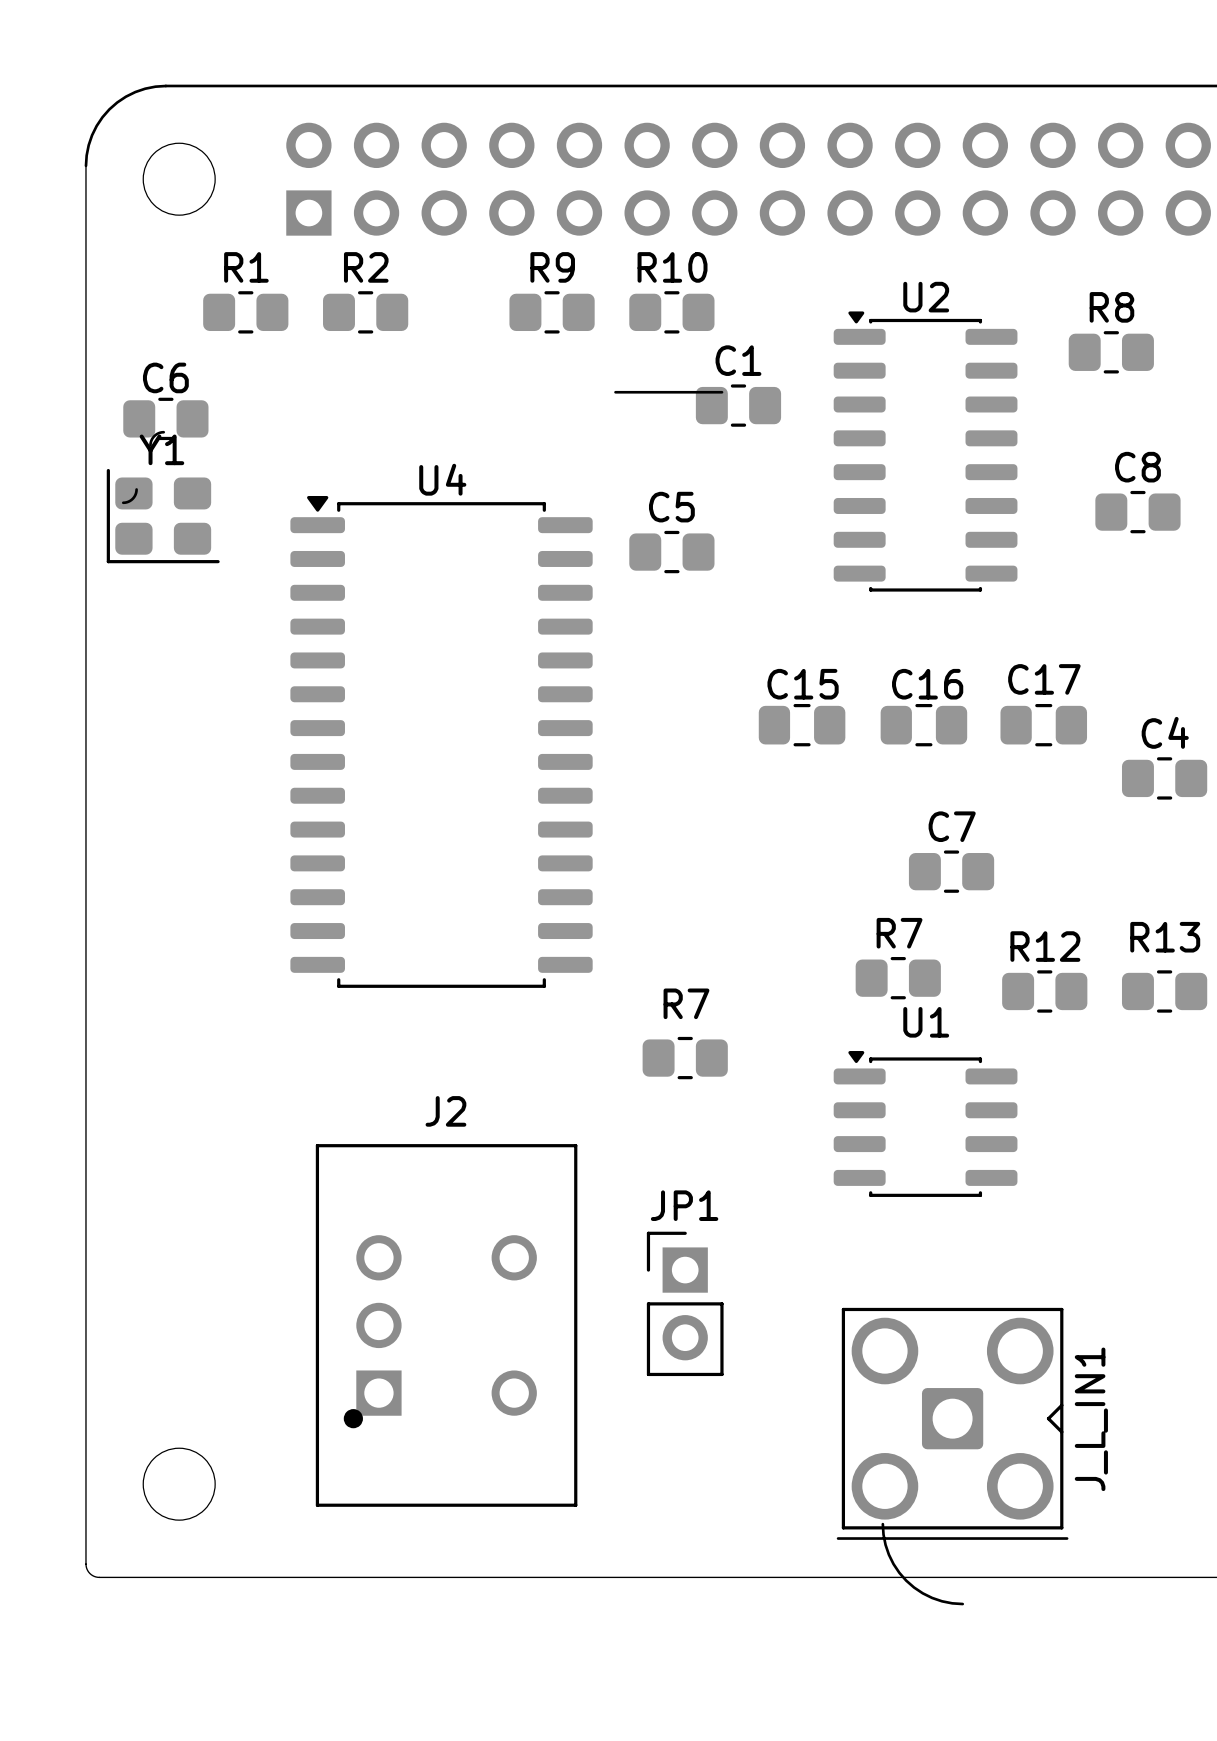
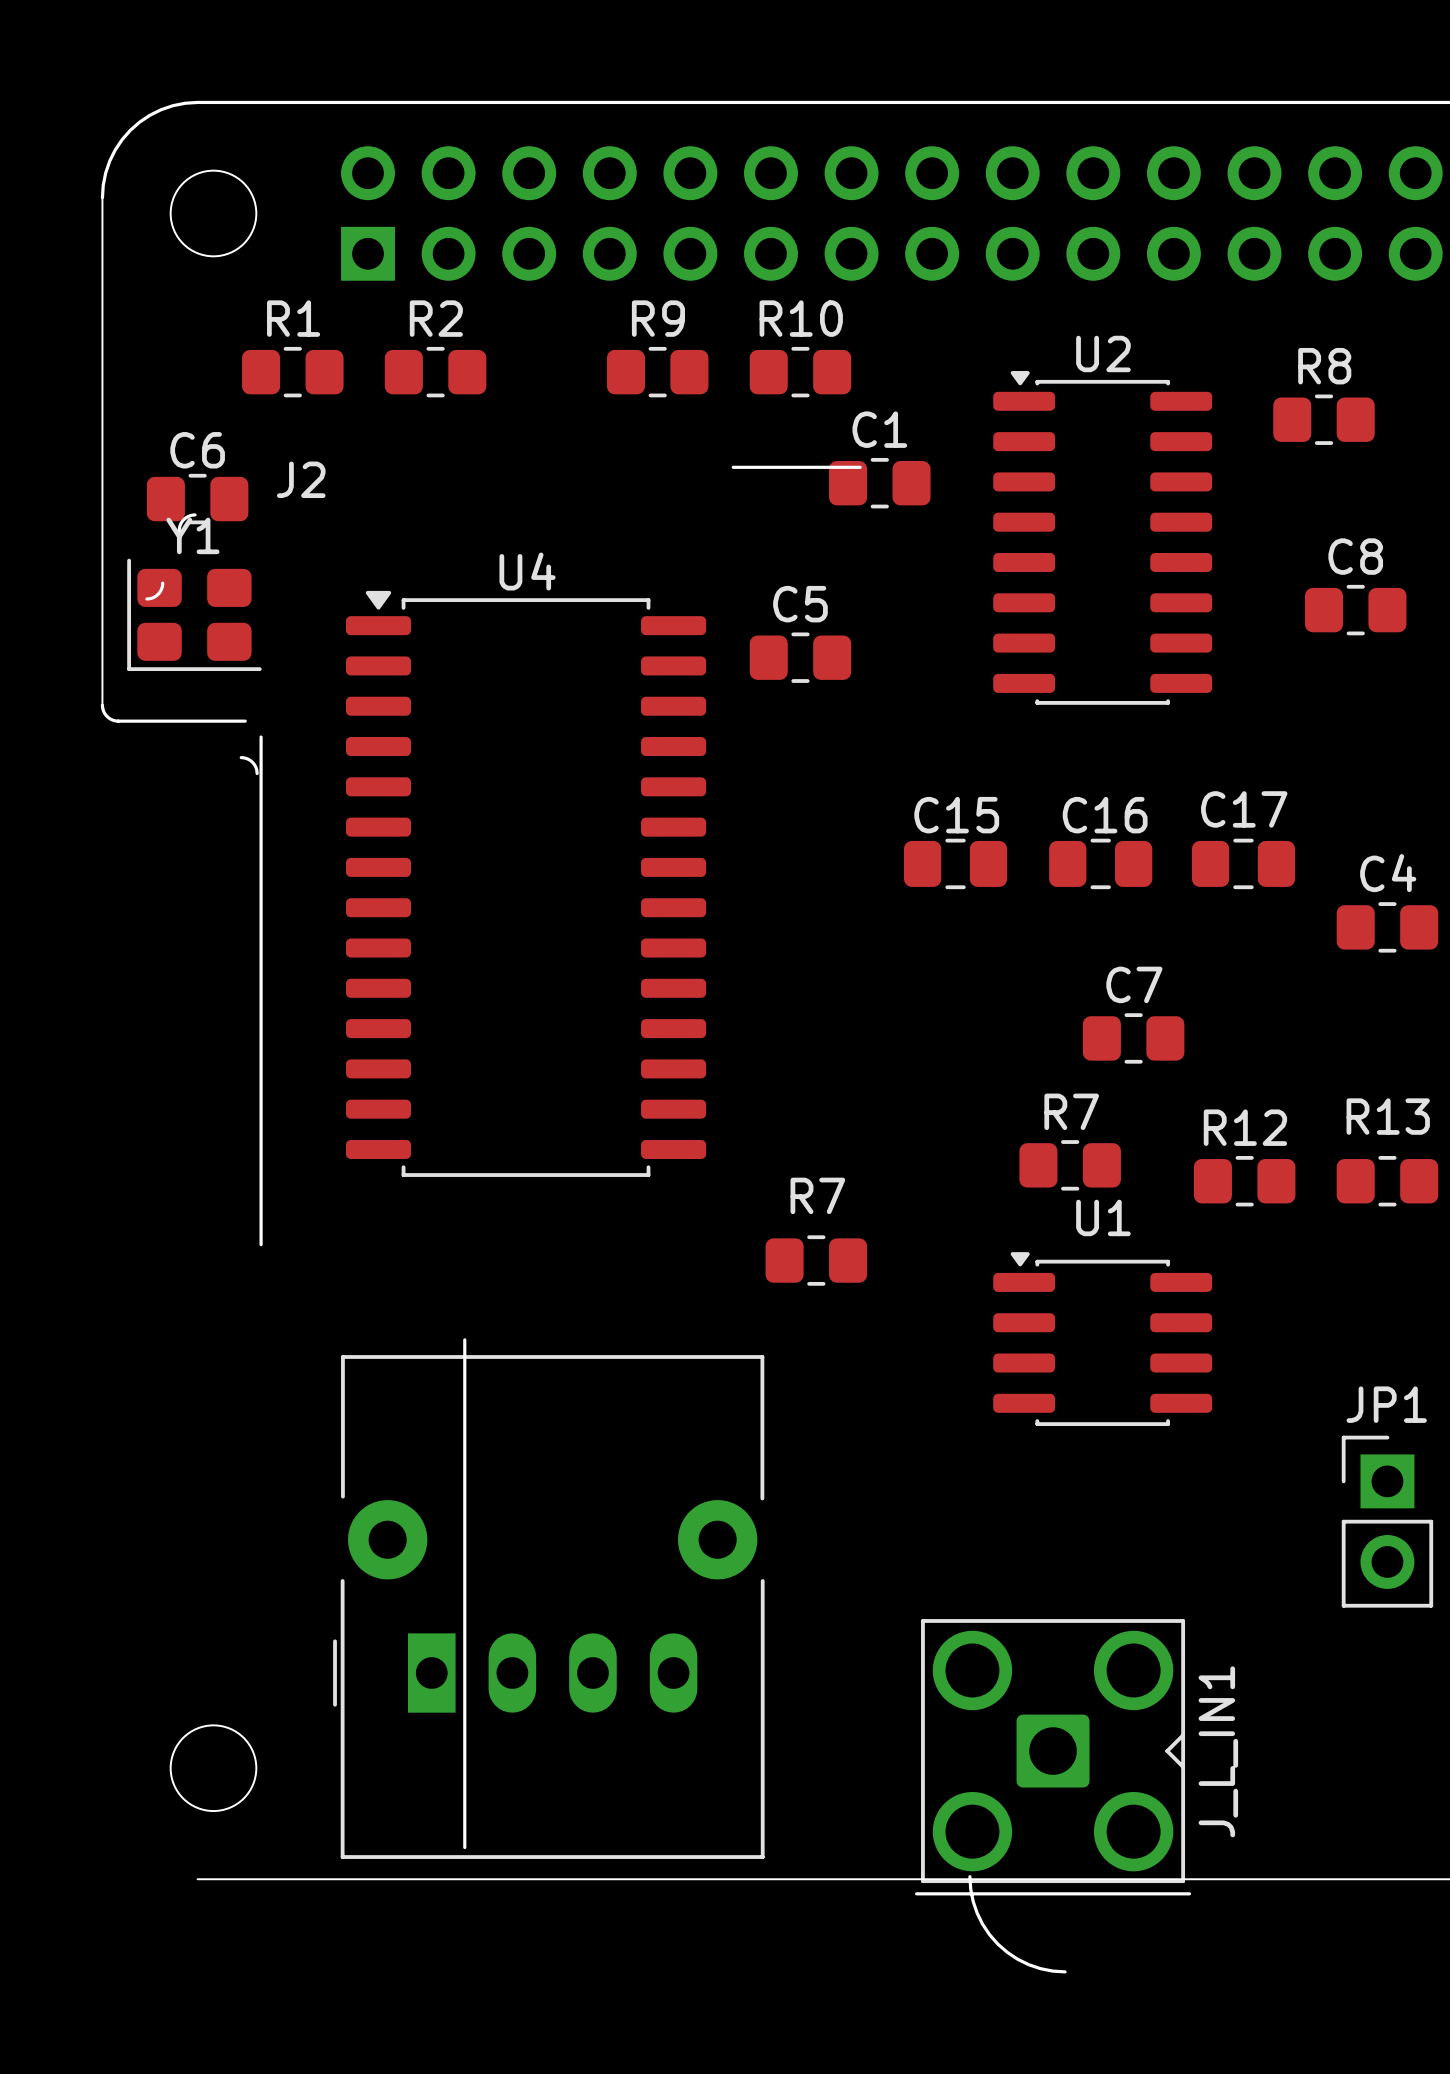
board edge: (85, 592) (86, 1565) (89, 1573) (97, 1577) (165, 1577) -> (102, 705) (105, 714) (116, 721) (245, 721)
board edge: none -> (261, 737) (261, 1244)
board edge: none -> (241, 757) (252, 762) (257, 773)
J2 name position: J2 (445, 1111) -> J2 (301, 479)
board edge: none -> (464, 1339) (464, 1847)
J2 footprint: [315, 1144, 578, 1507] -> [333, 1355, 765, 1859]
JP1 position: (685, 1303) -> (1387, 1521)
J_L_IN1 position: (952, 1423) -> (1053, 1757)
board edge: (882, 1524) (888, 1554) (906, 1580) (932, 1597) (962, 1604) -> (969, 1876) (970, 1889) (977, 1913) (982, 1924) (997, 1944) (1007, 1952) (1028, 1964) (1052, 1971) (1065, 1971)

